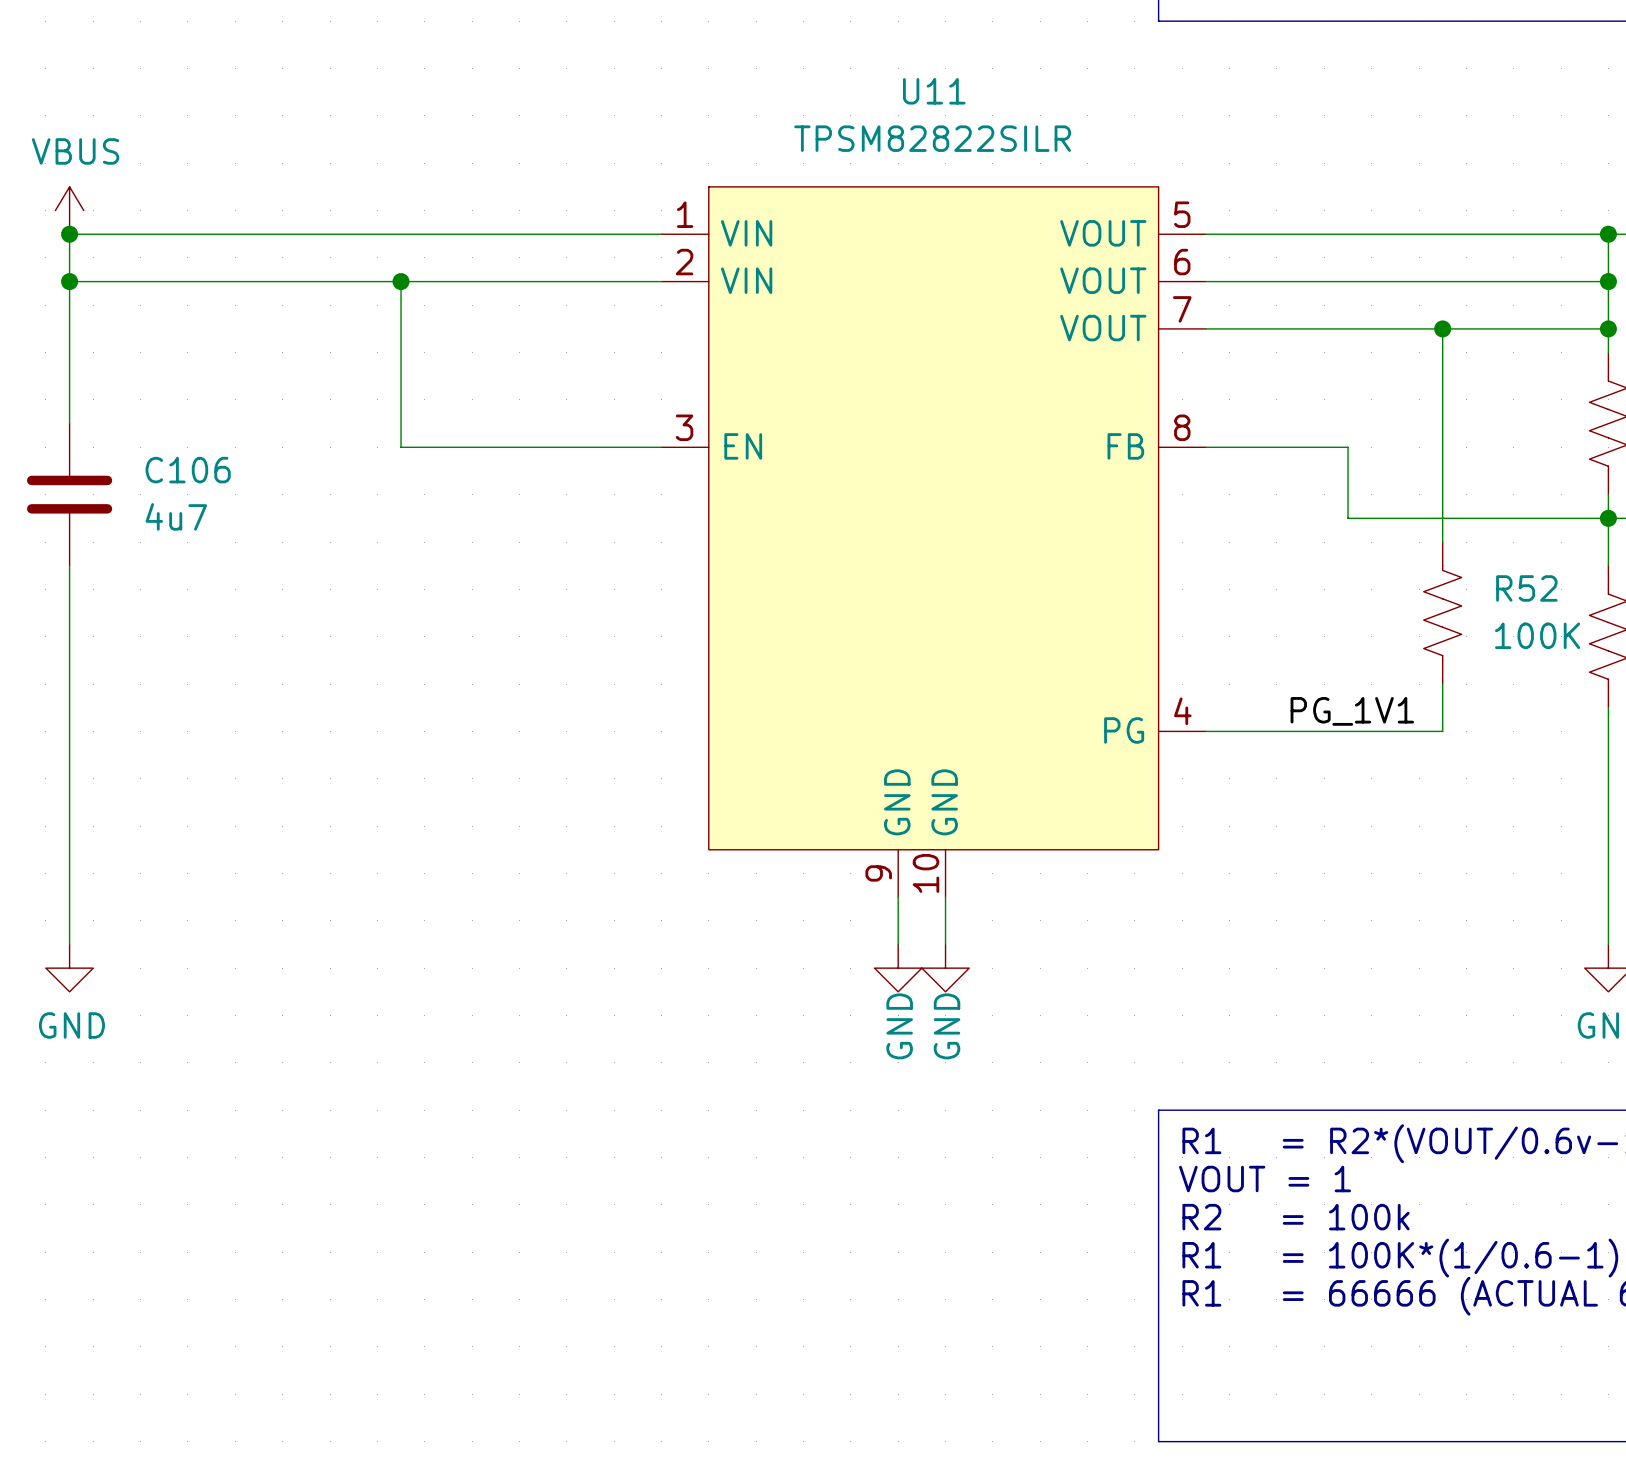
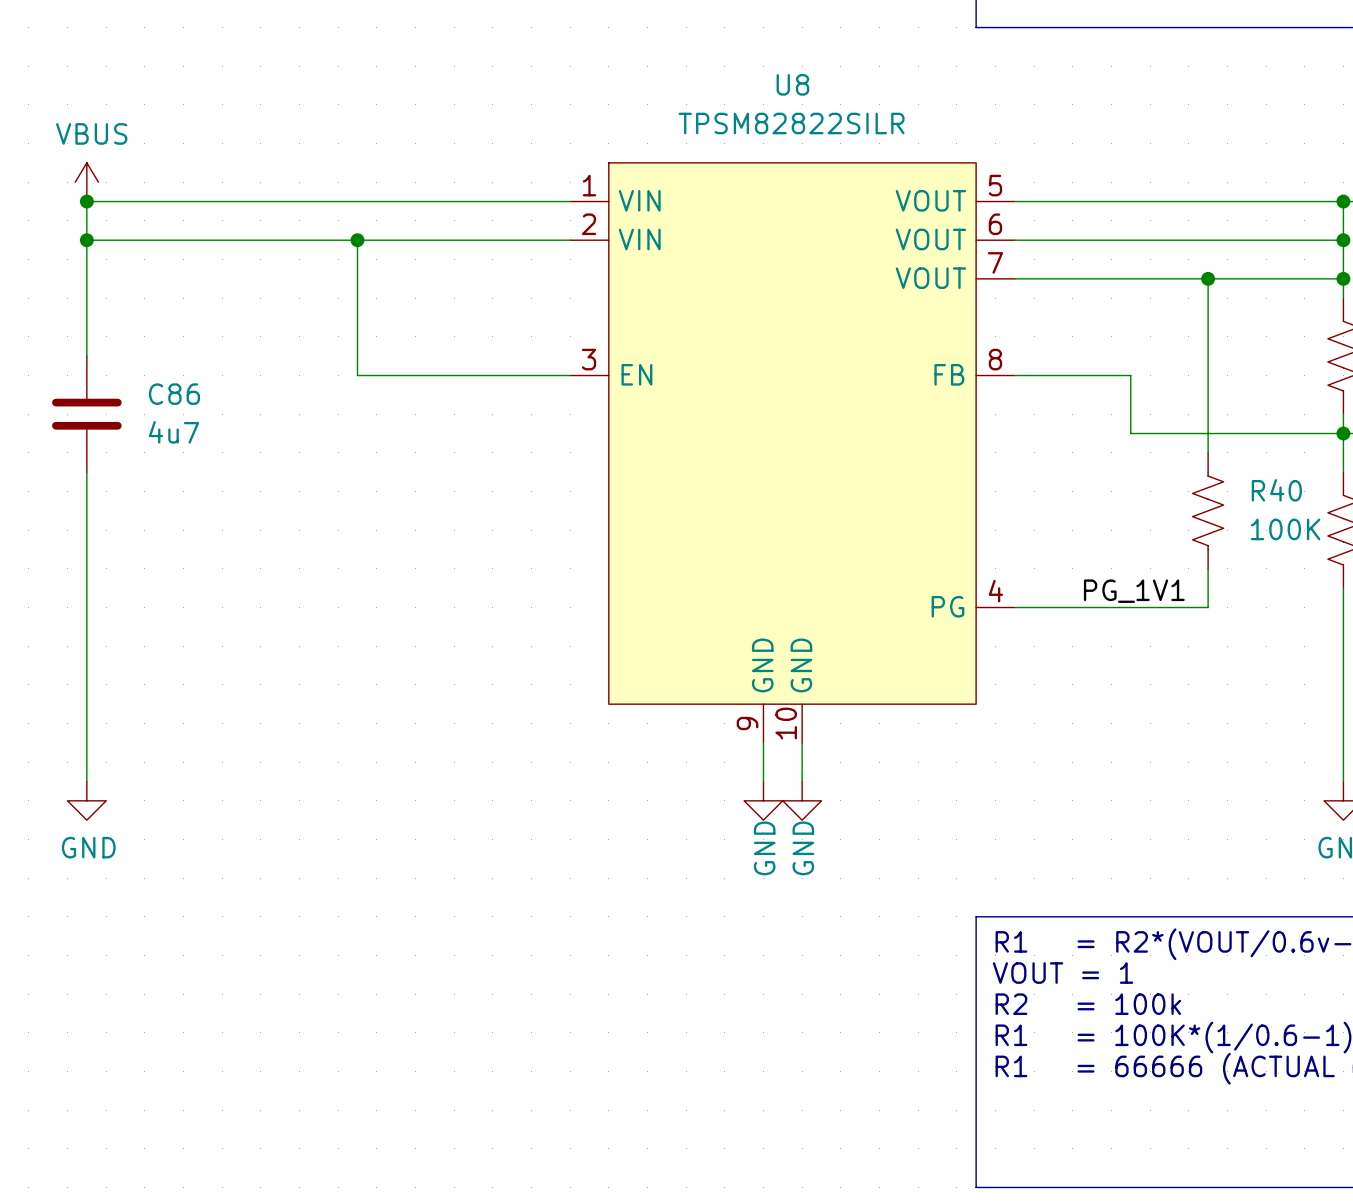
U11 name: U11 (934, 91) -> U8 (792, 84)
C106 name: C106 (188, 470) -> C86 (174, 394)
R52 name: R52 (1526, 588) -> R40 (1276, 490)

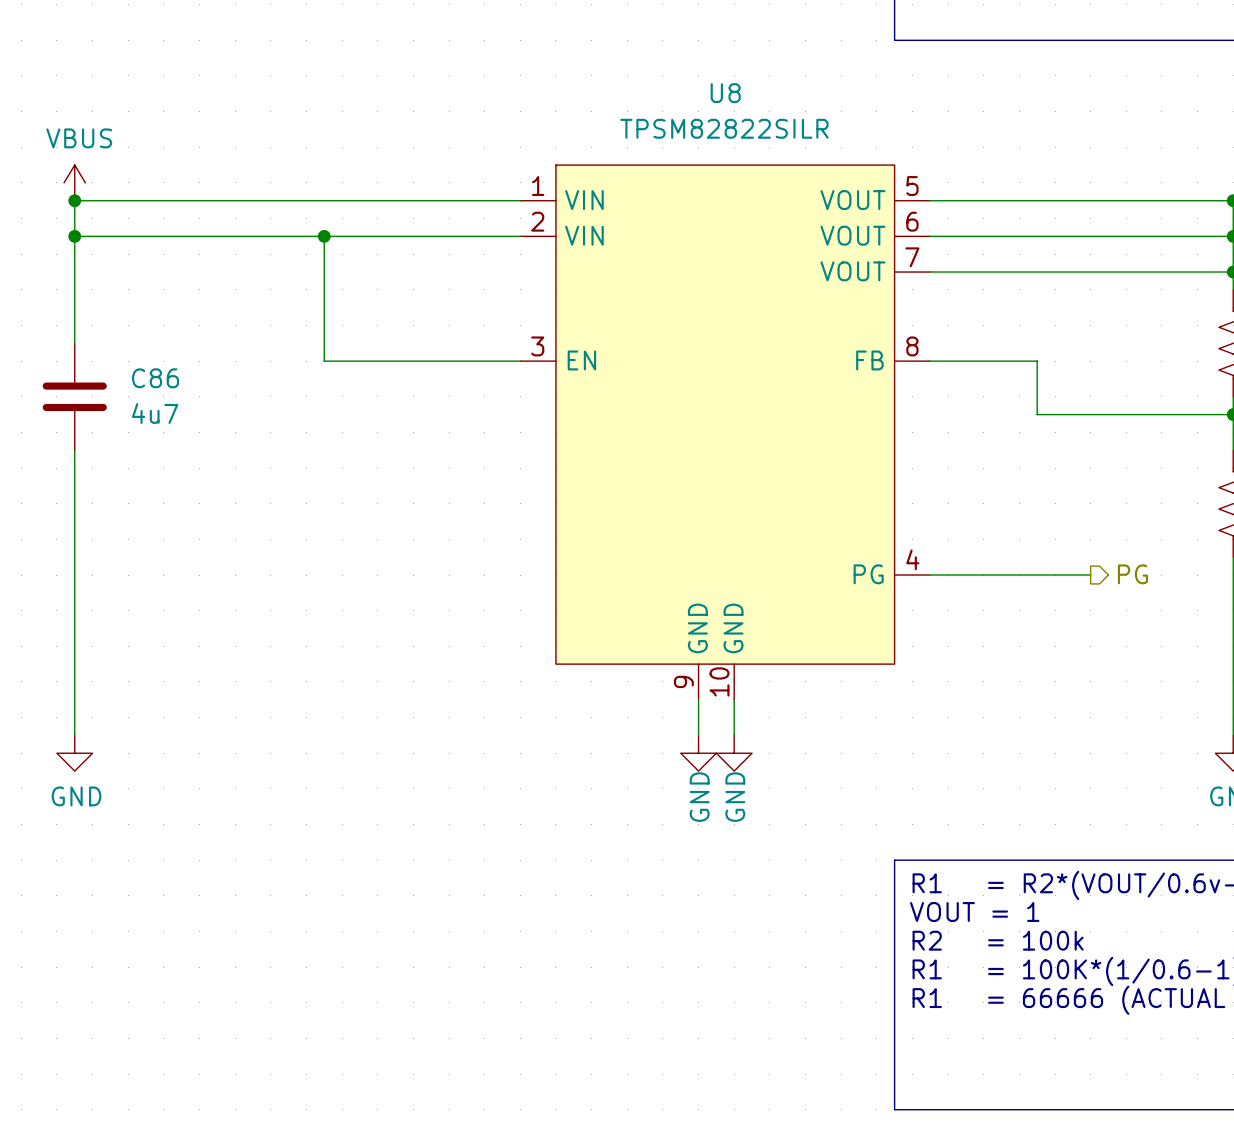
wire: (1208, 278) (1208, 452) -> none
junction: (1208, 278) -> none
R40: 100K (1208, 510) -> none
wire: (1208, 568) (1208, 607) (1188, 607) -> none
label: PG_1V1 (1134, 591) -> none
hierarchical label: none -> PG (1132, 574)

